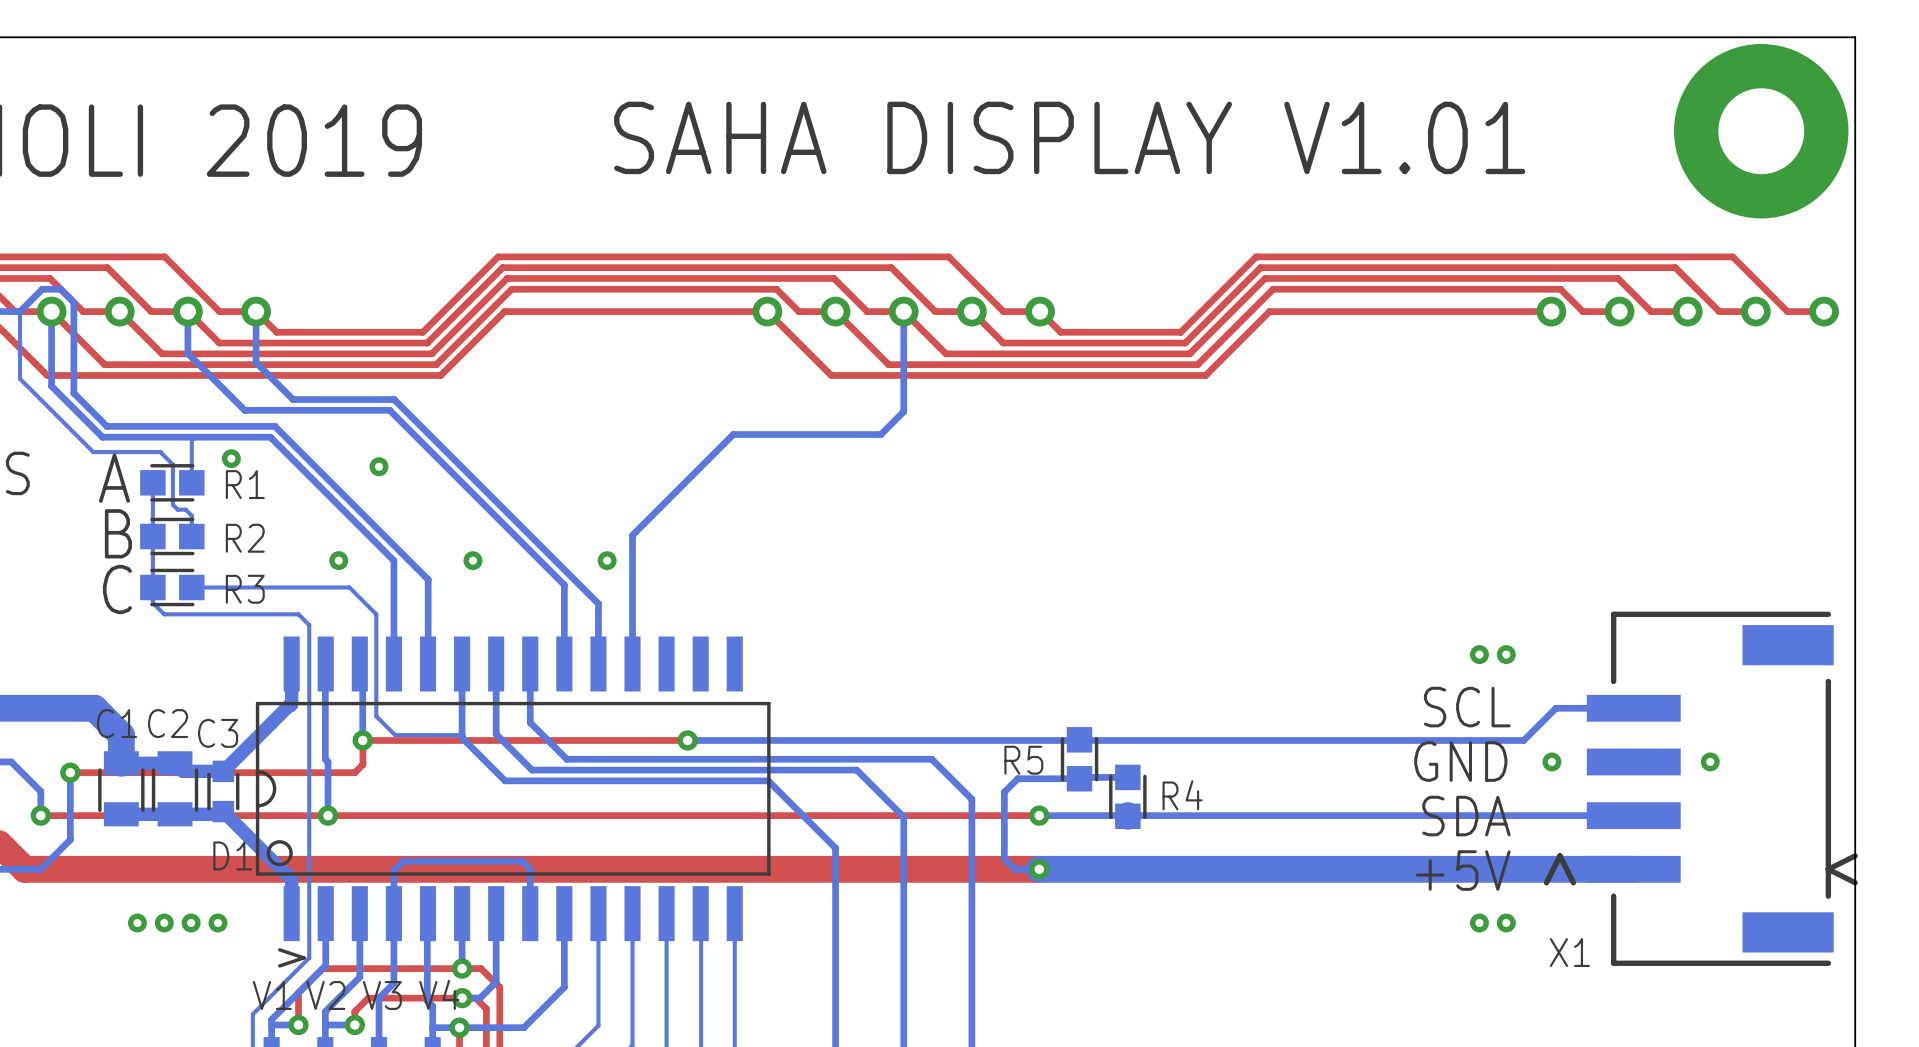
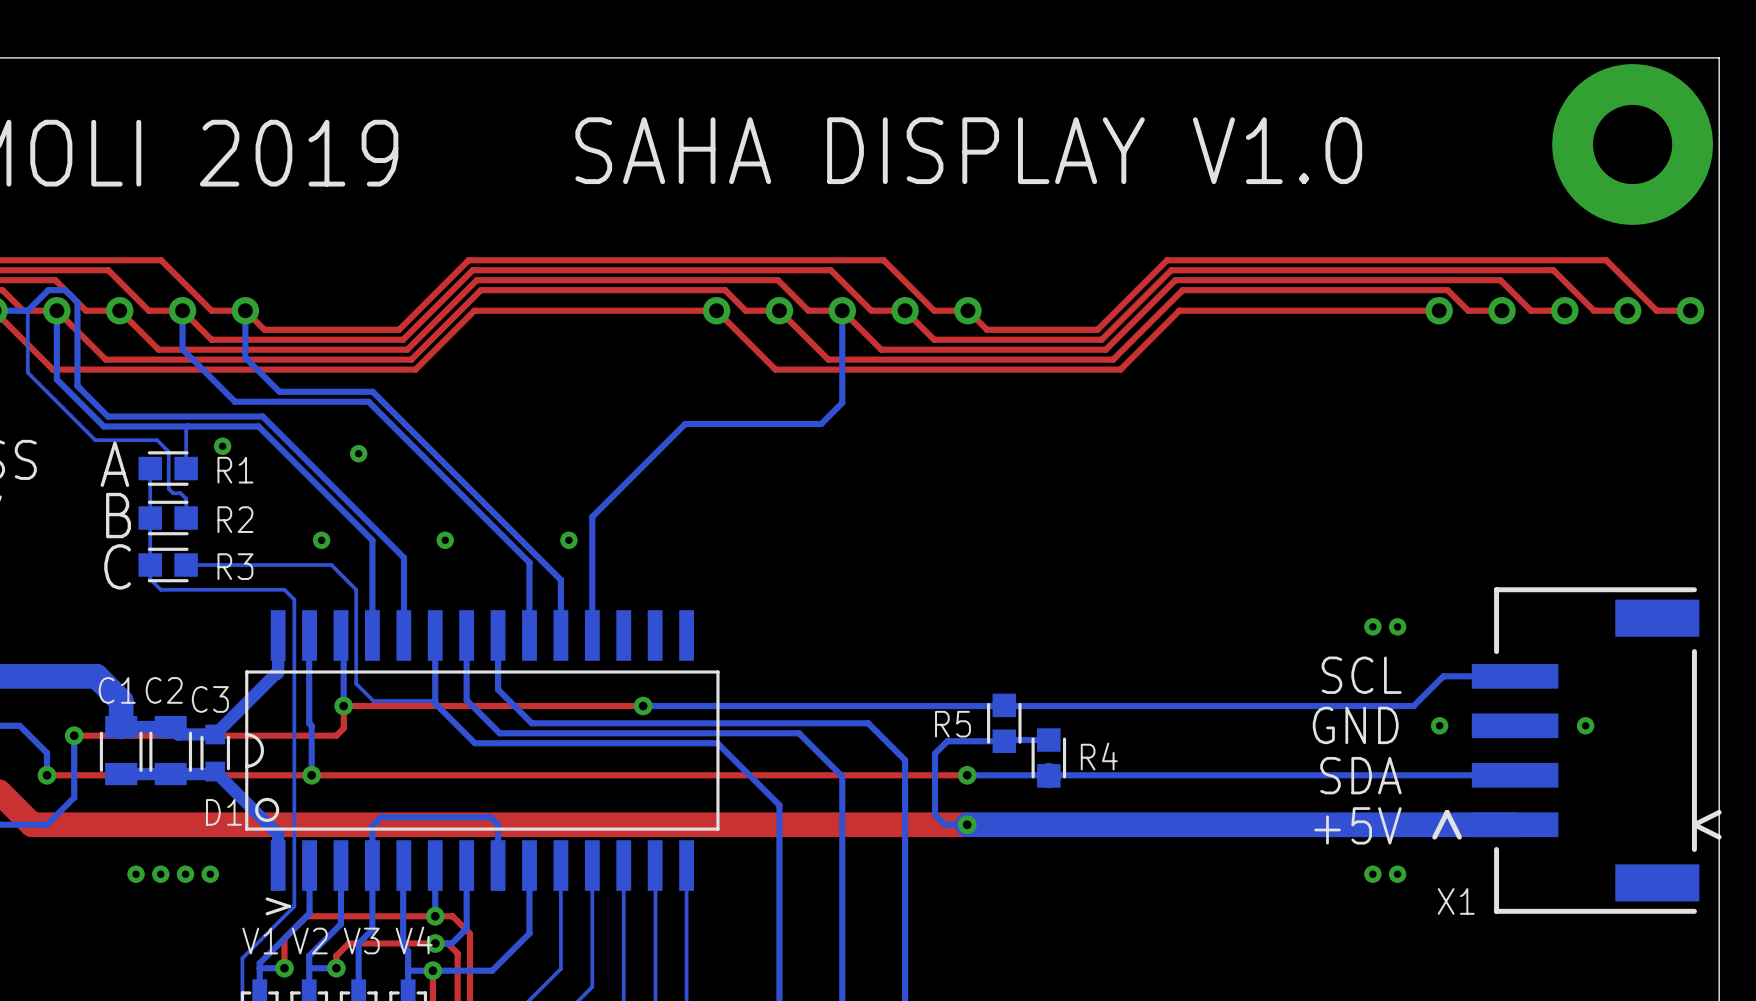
text: SAHA DISPLAY V1.01 (1069, 137) -> SAHA DISPLAY V1.0 (968, 150)

